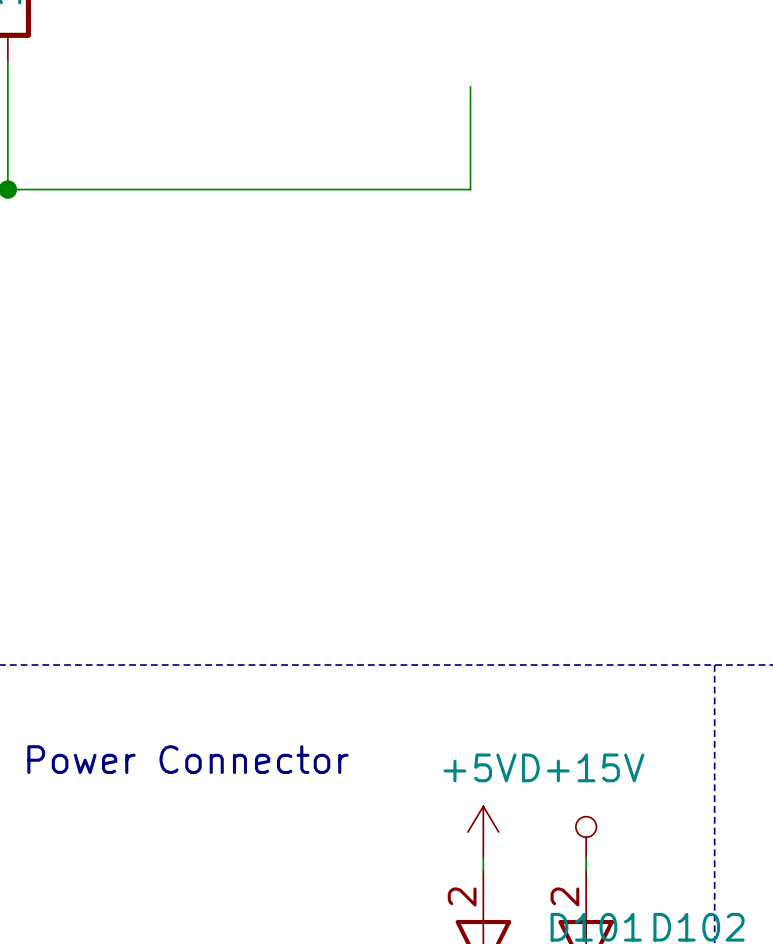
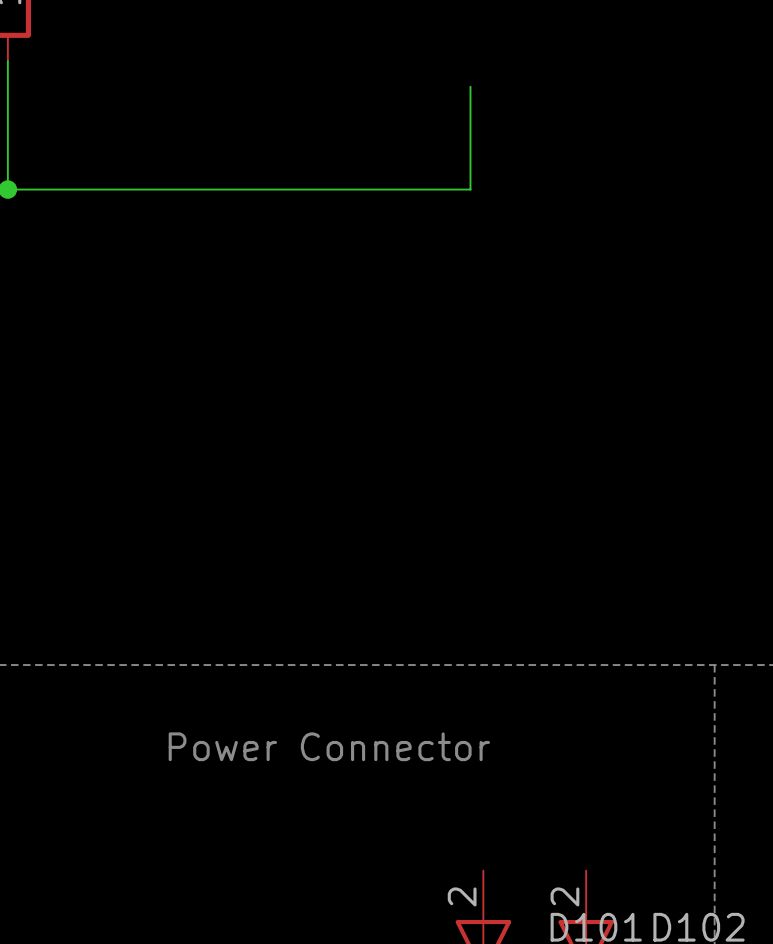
text position: Power Connector (187, 759) -> Power Connector (329, 746)
power symbol: +5VD (483, 832) -> none
power symbol: +15V (586, 837) -> none
wire: (483, 857) (483, 870) -> none
wire: (586, 857) (586, 870) -> none

